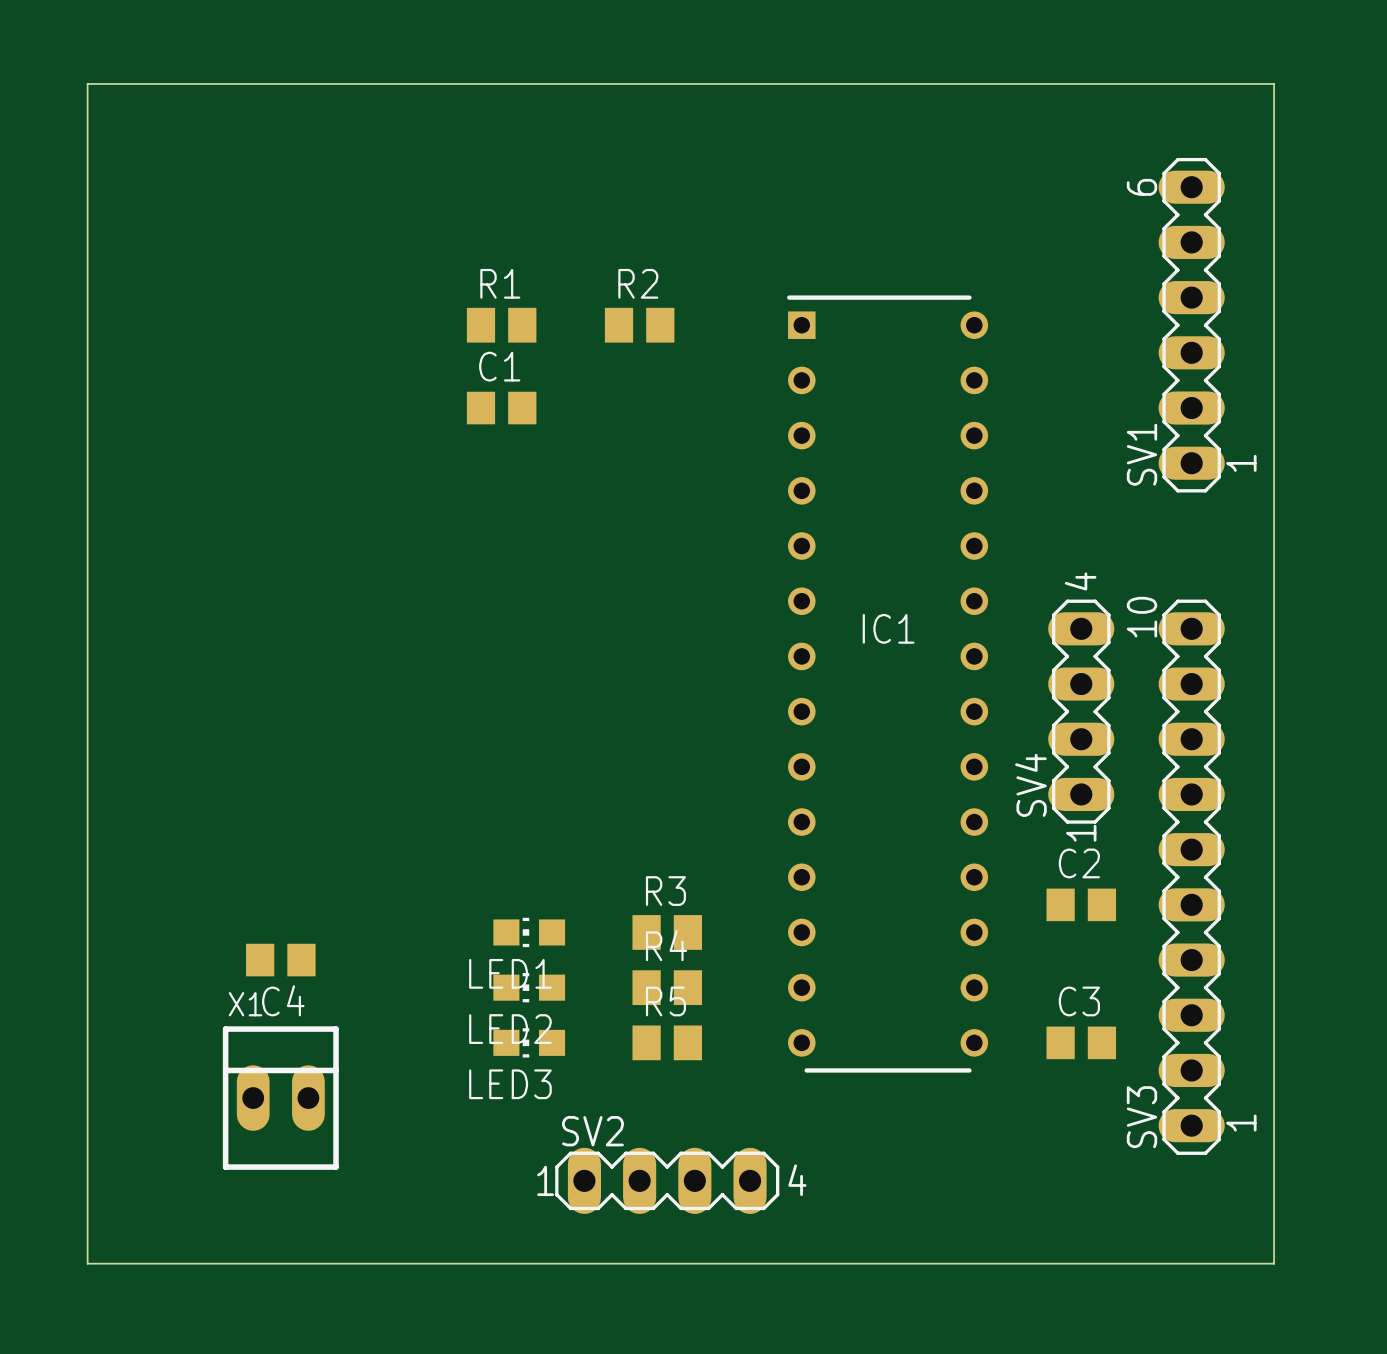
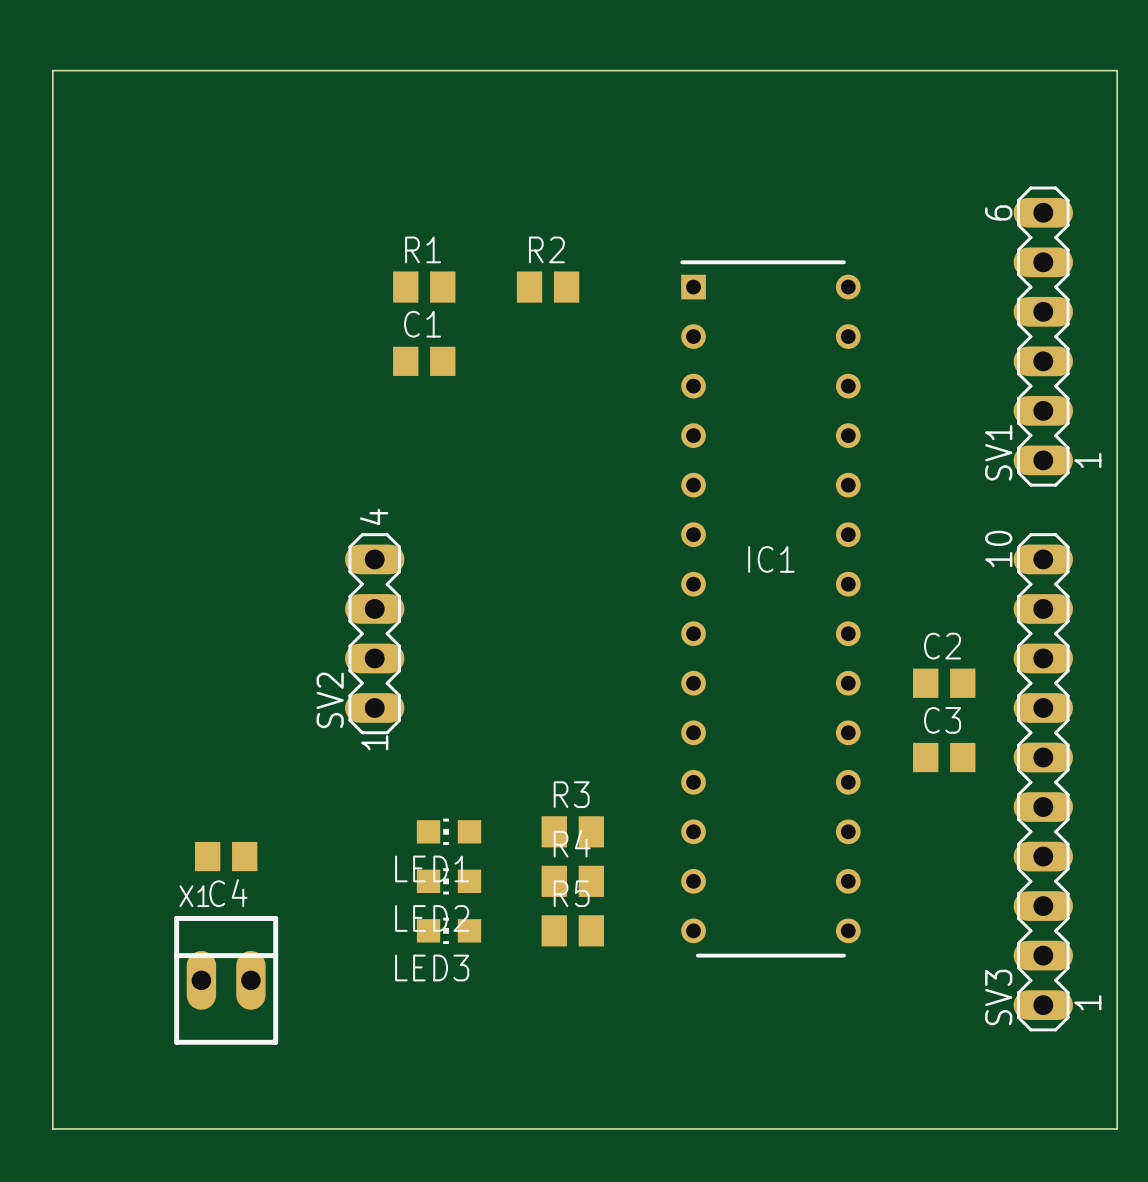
SV1 position: (1191, 325) -> (1043, 336)
SV4: (1081, 711) -> none
C2 position: (1081, 904) -> (944, 683)
C3 position: (1081, 1042) -> (944, 757)
SV2 rotation: 0° (667, 1180) -> 90° counterclockwise (374, 633)
SV2 position: (667, 1180) -> (374, 633)

